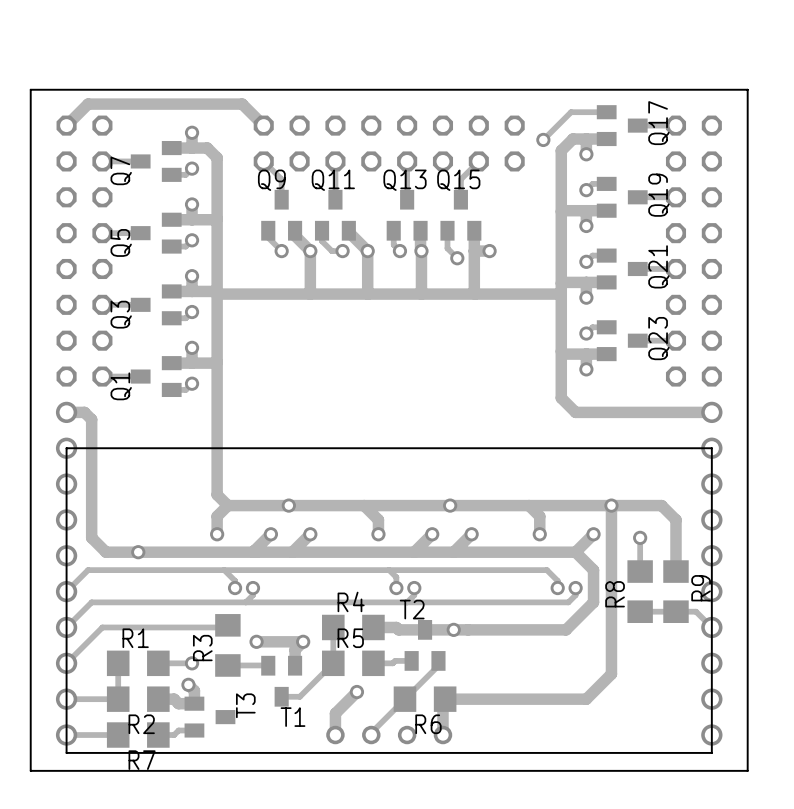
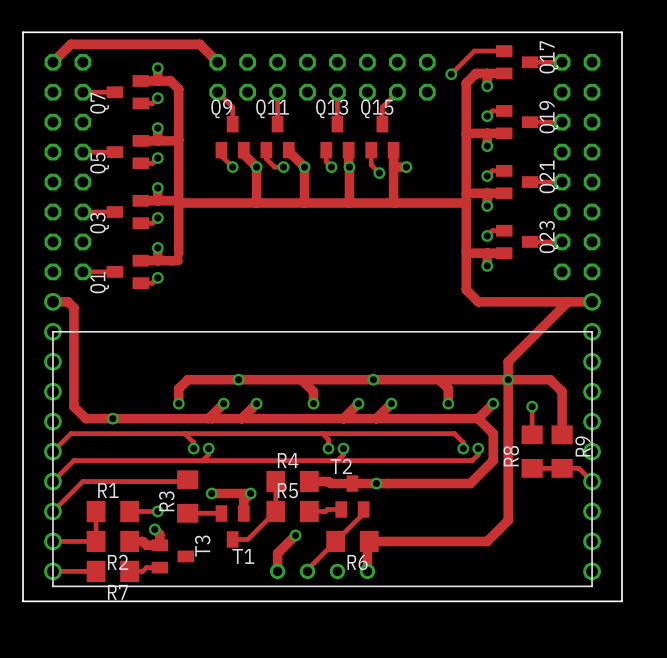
track: (217, 355) (217, 494) (227, 505) -> none
track: none -> (568, 301) (508, 361) (508, 379)

